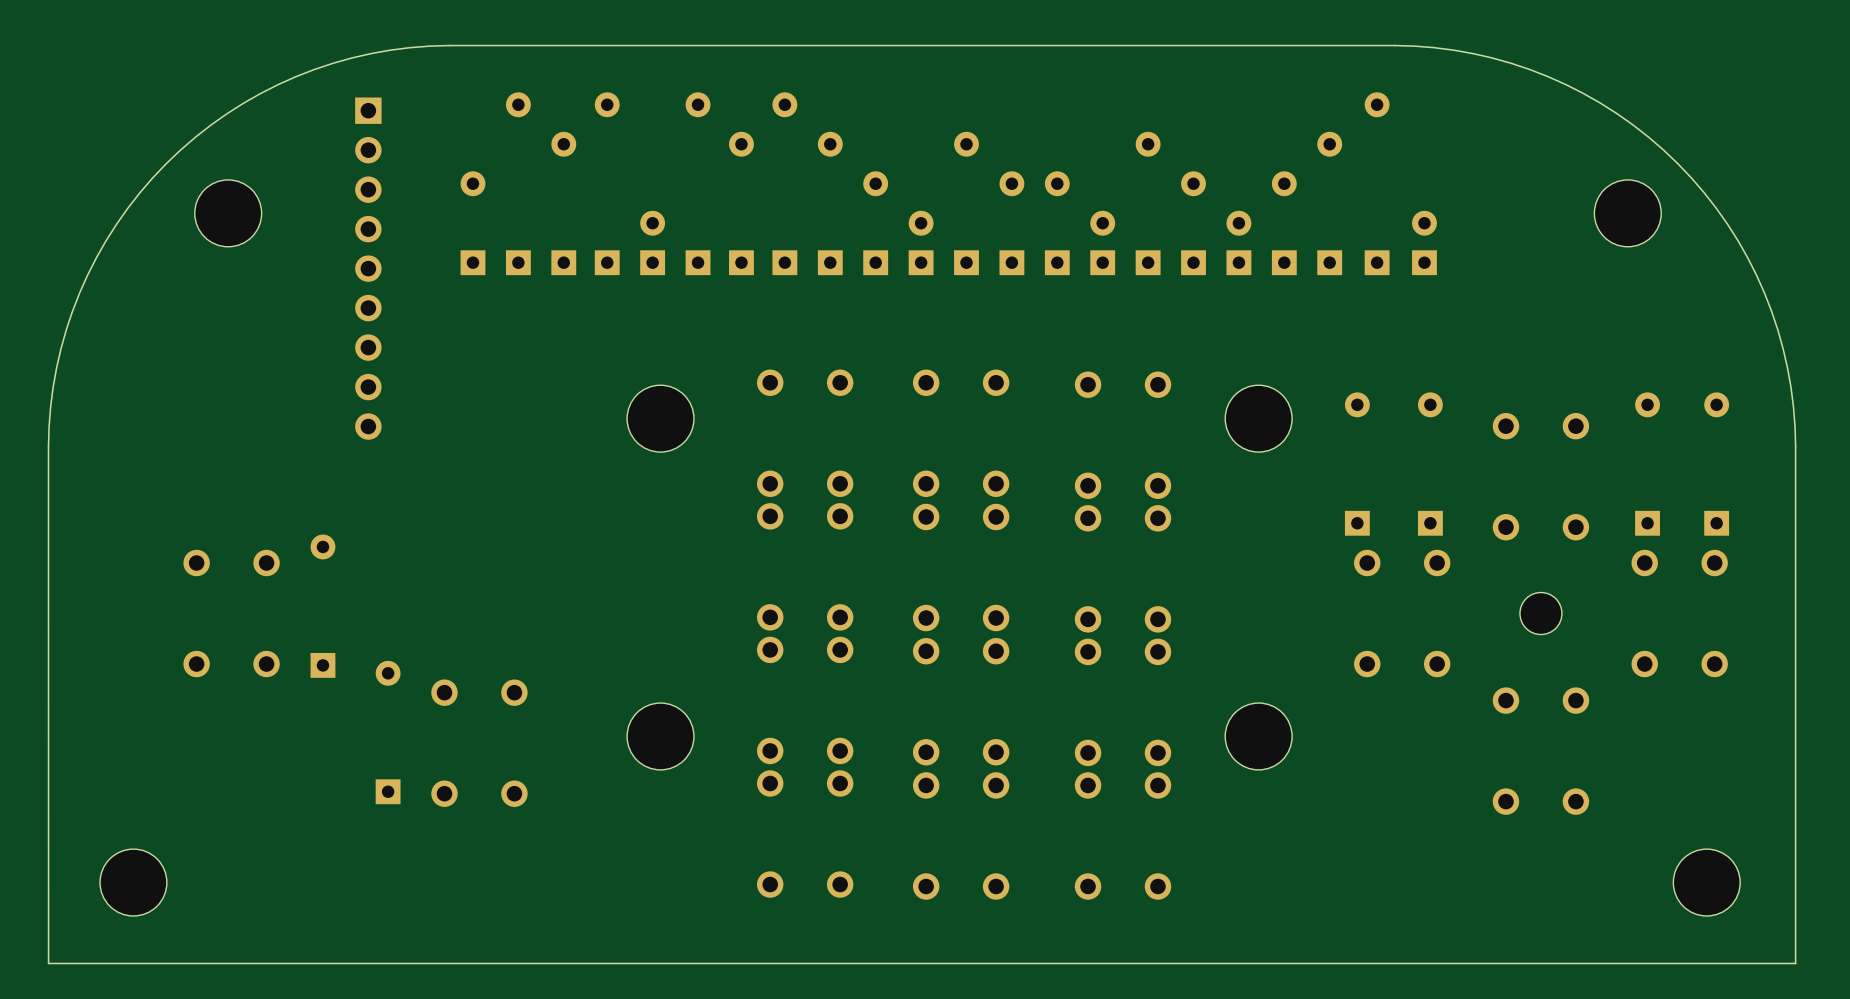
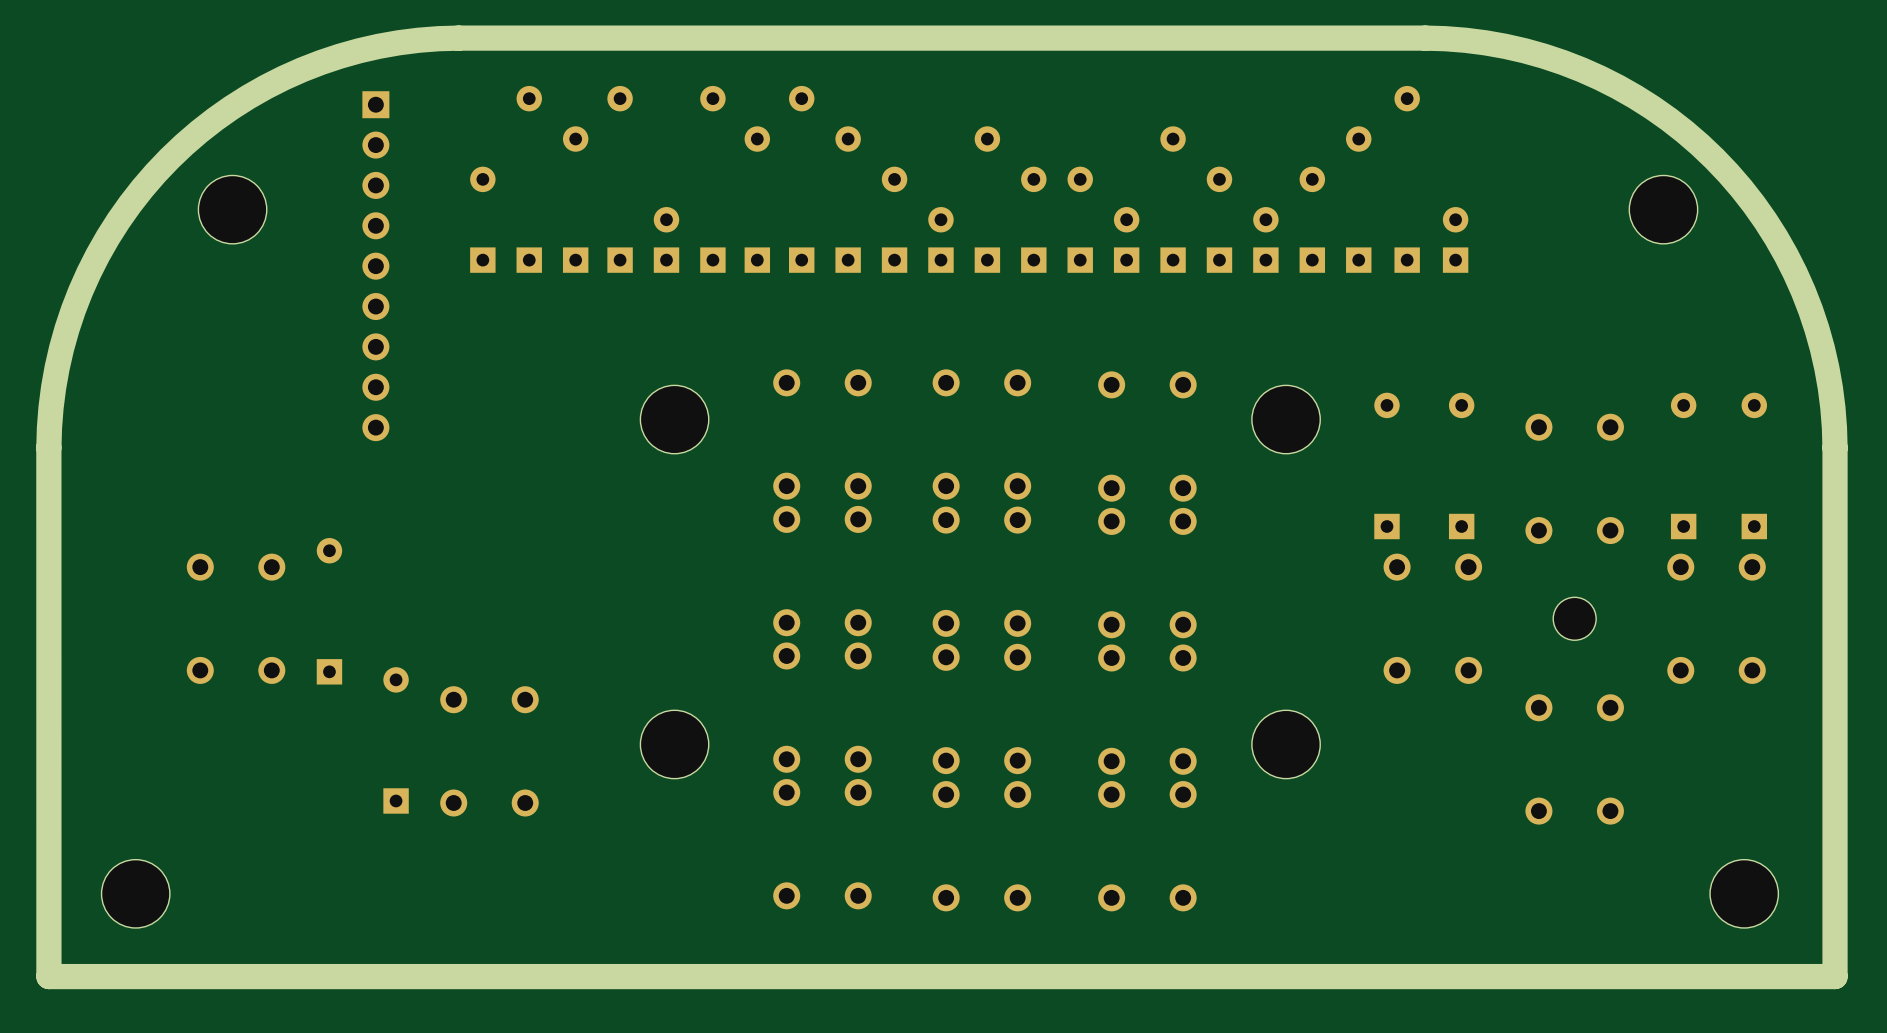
board edge width: thin (1394, 45) (429, 46) (371, 53) (333, 63) (278, 84) (227, 113) (195, 137) (166, 163) (140, 192) (116, 224) (96, 257) (79, 293) (66, 330) (56, 368) (50, 407) (48, 446) (48, 963) (1795, 963) (1795, 426) (1787, 368) (1777, 330) (1764, 293) (1738, 240) (1704, 192) (1663, 149) (1617, 113) (1565, 84) (1510, 63) (1453, 50) (1394, 45) -> thick (1425, 38) (438, 38) (378, 46) (339, 56) (283, 77) (231, 107) (199, 131) (169, 158) (142, 188) (118, 220) (97, 255) (80, 291) (66, 329) (57, 368) (51, 407) (48, 447) (48, 976) (1835, 976) (1834, 427) (1826, 368) (1816, 329) (1803, 291) (1776, 237) (1741, 188) (1699, 144) (1652, 107) (1600, 78) (1544, 56) (1485, 42) (1425, 38)

